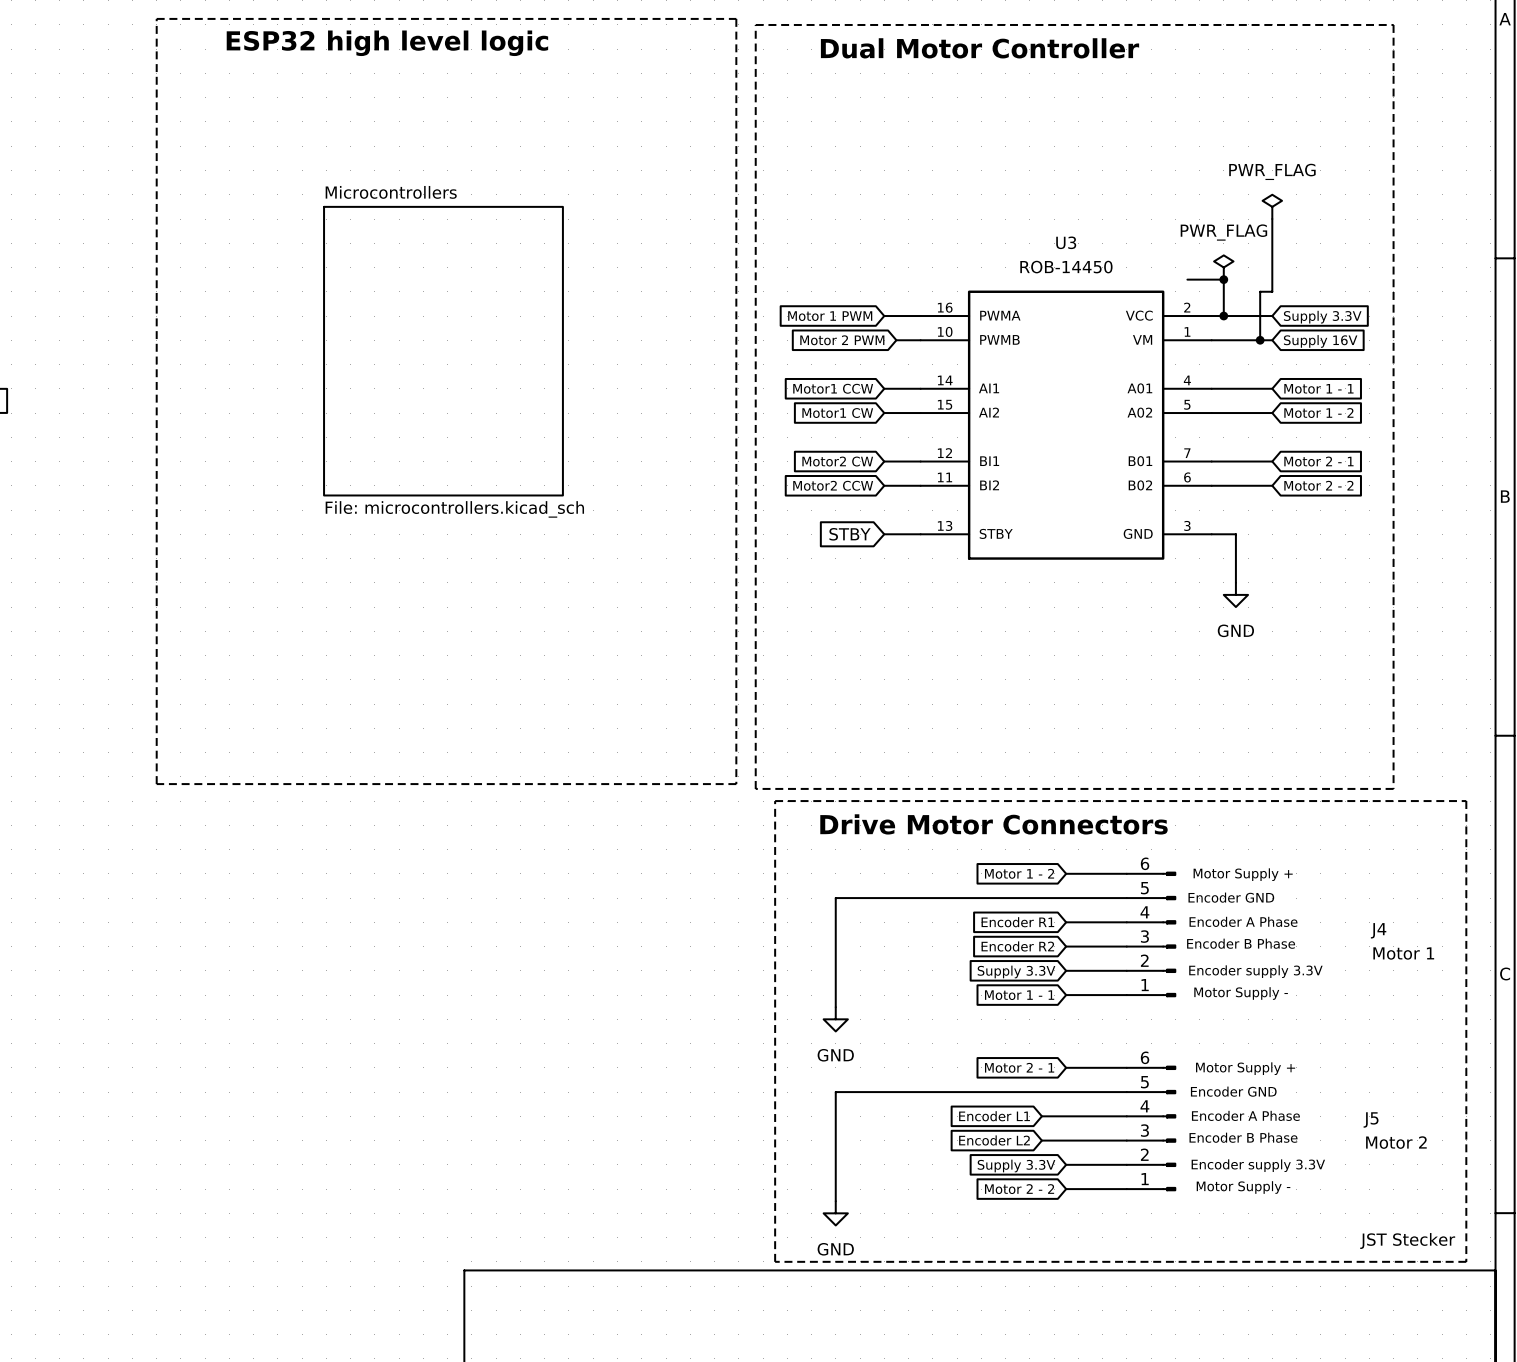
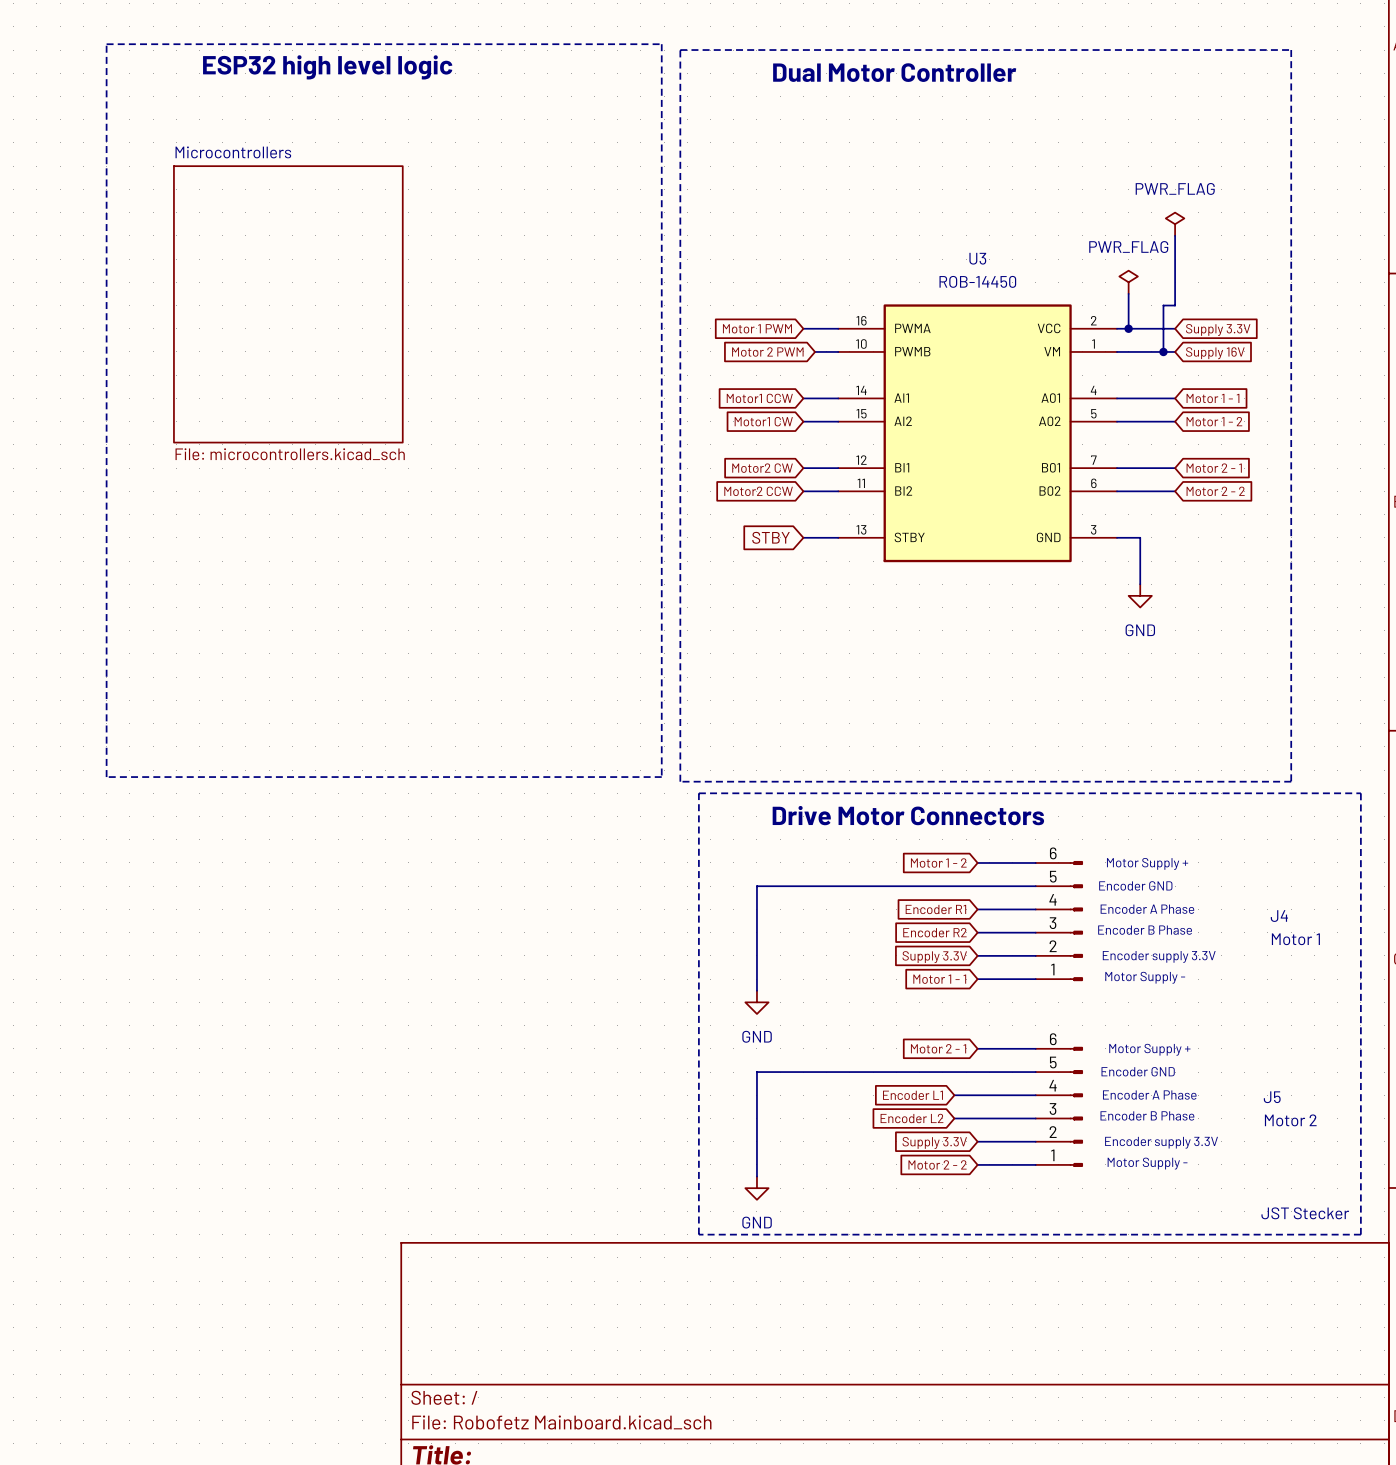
wire: (1187, 279) (1223, 279) -> none
junction: (1223, 279) -> none
sheet Microcontrollers position: (443, 351) -> (288, 304)

